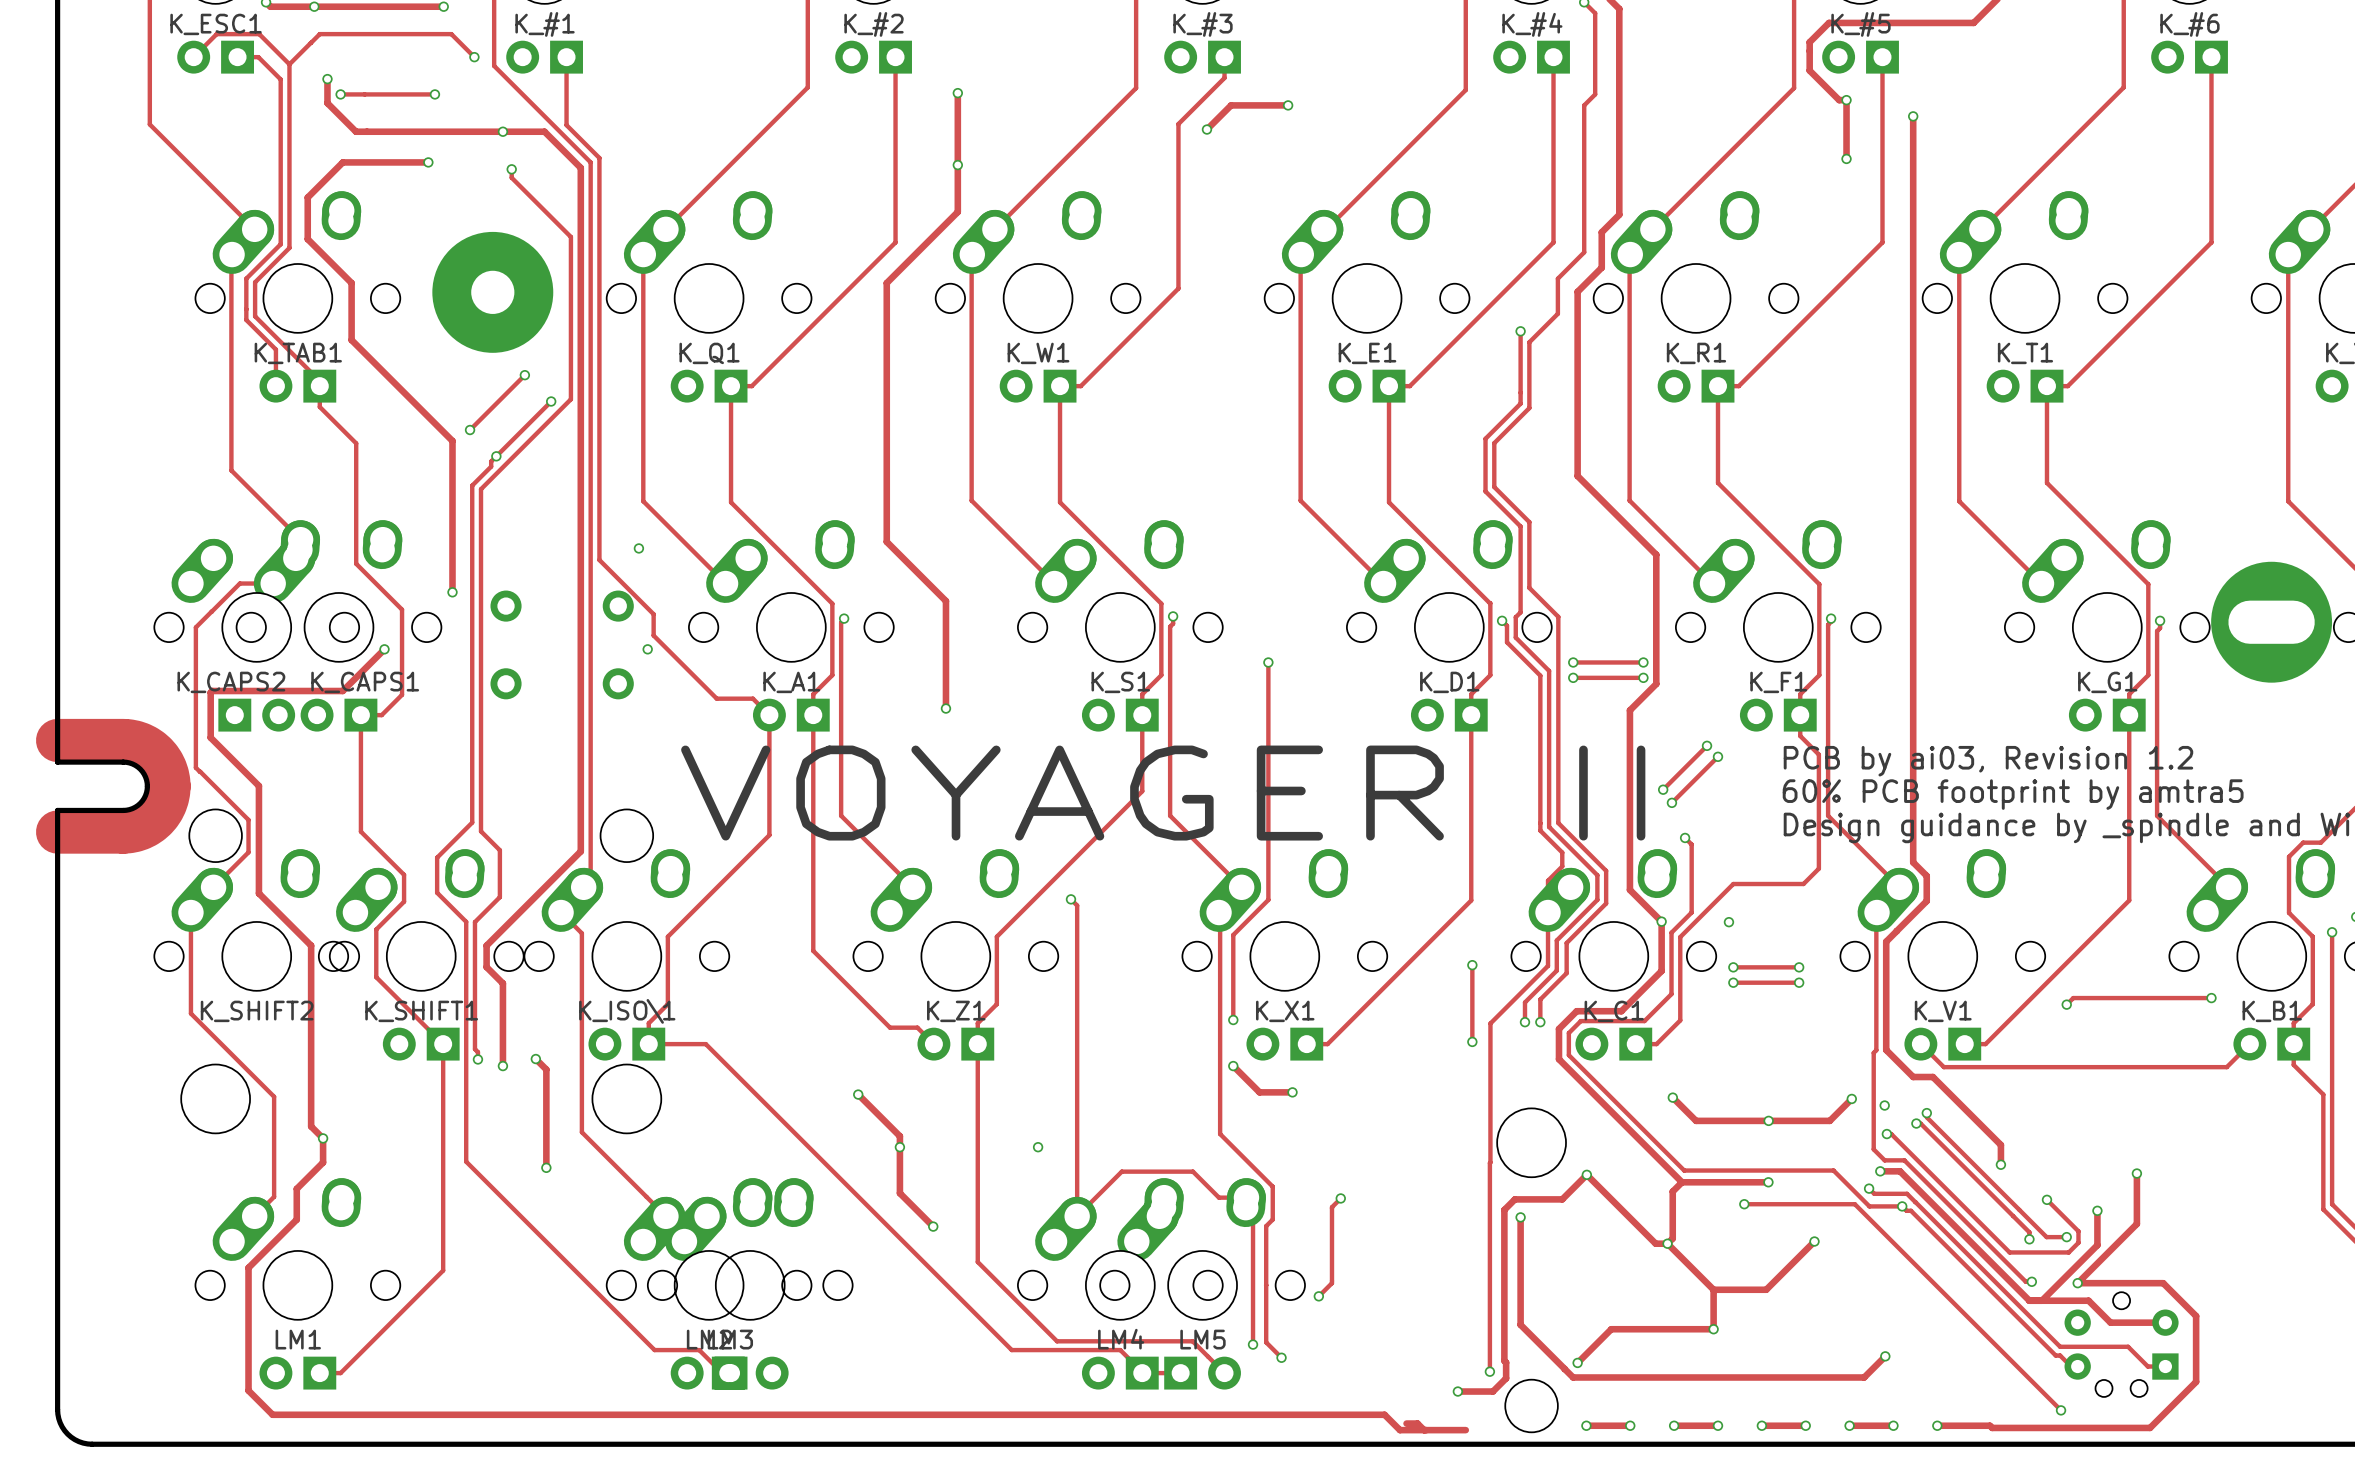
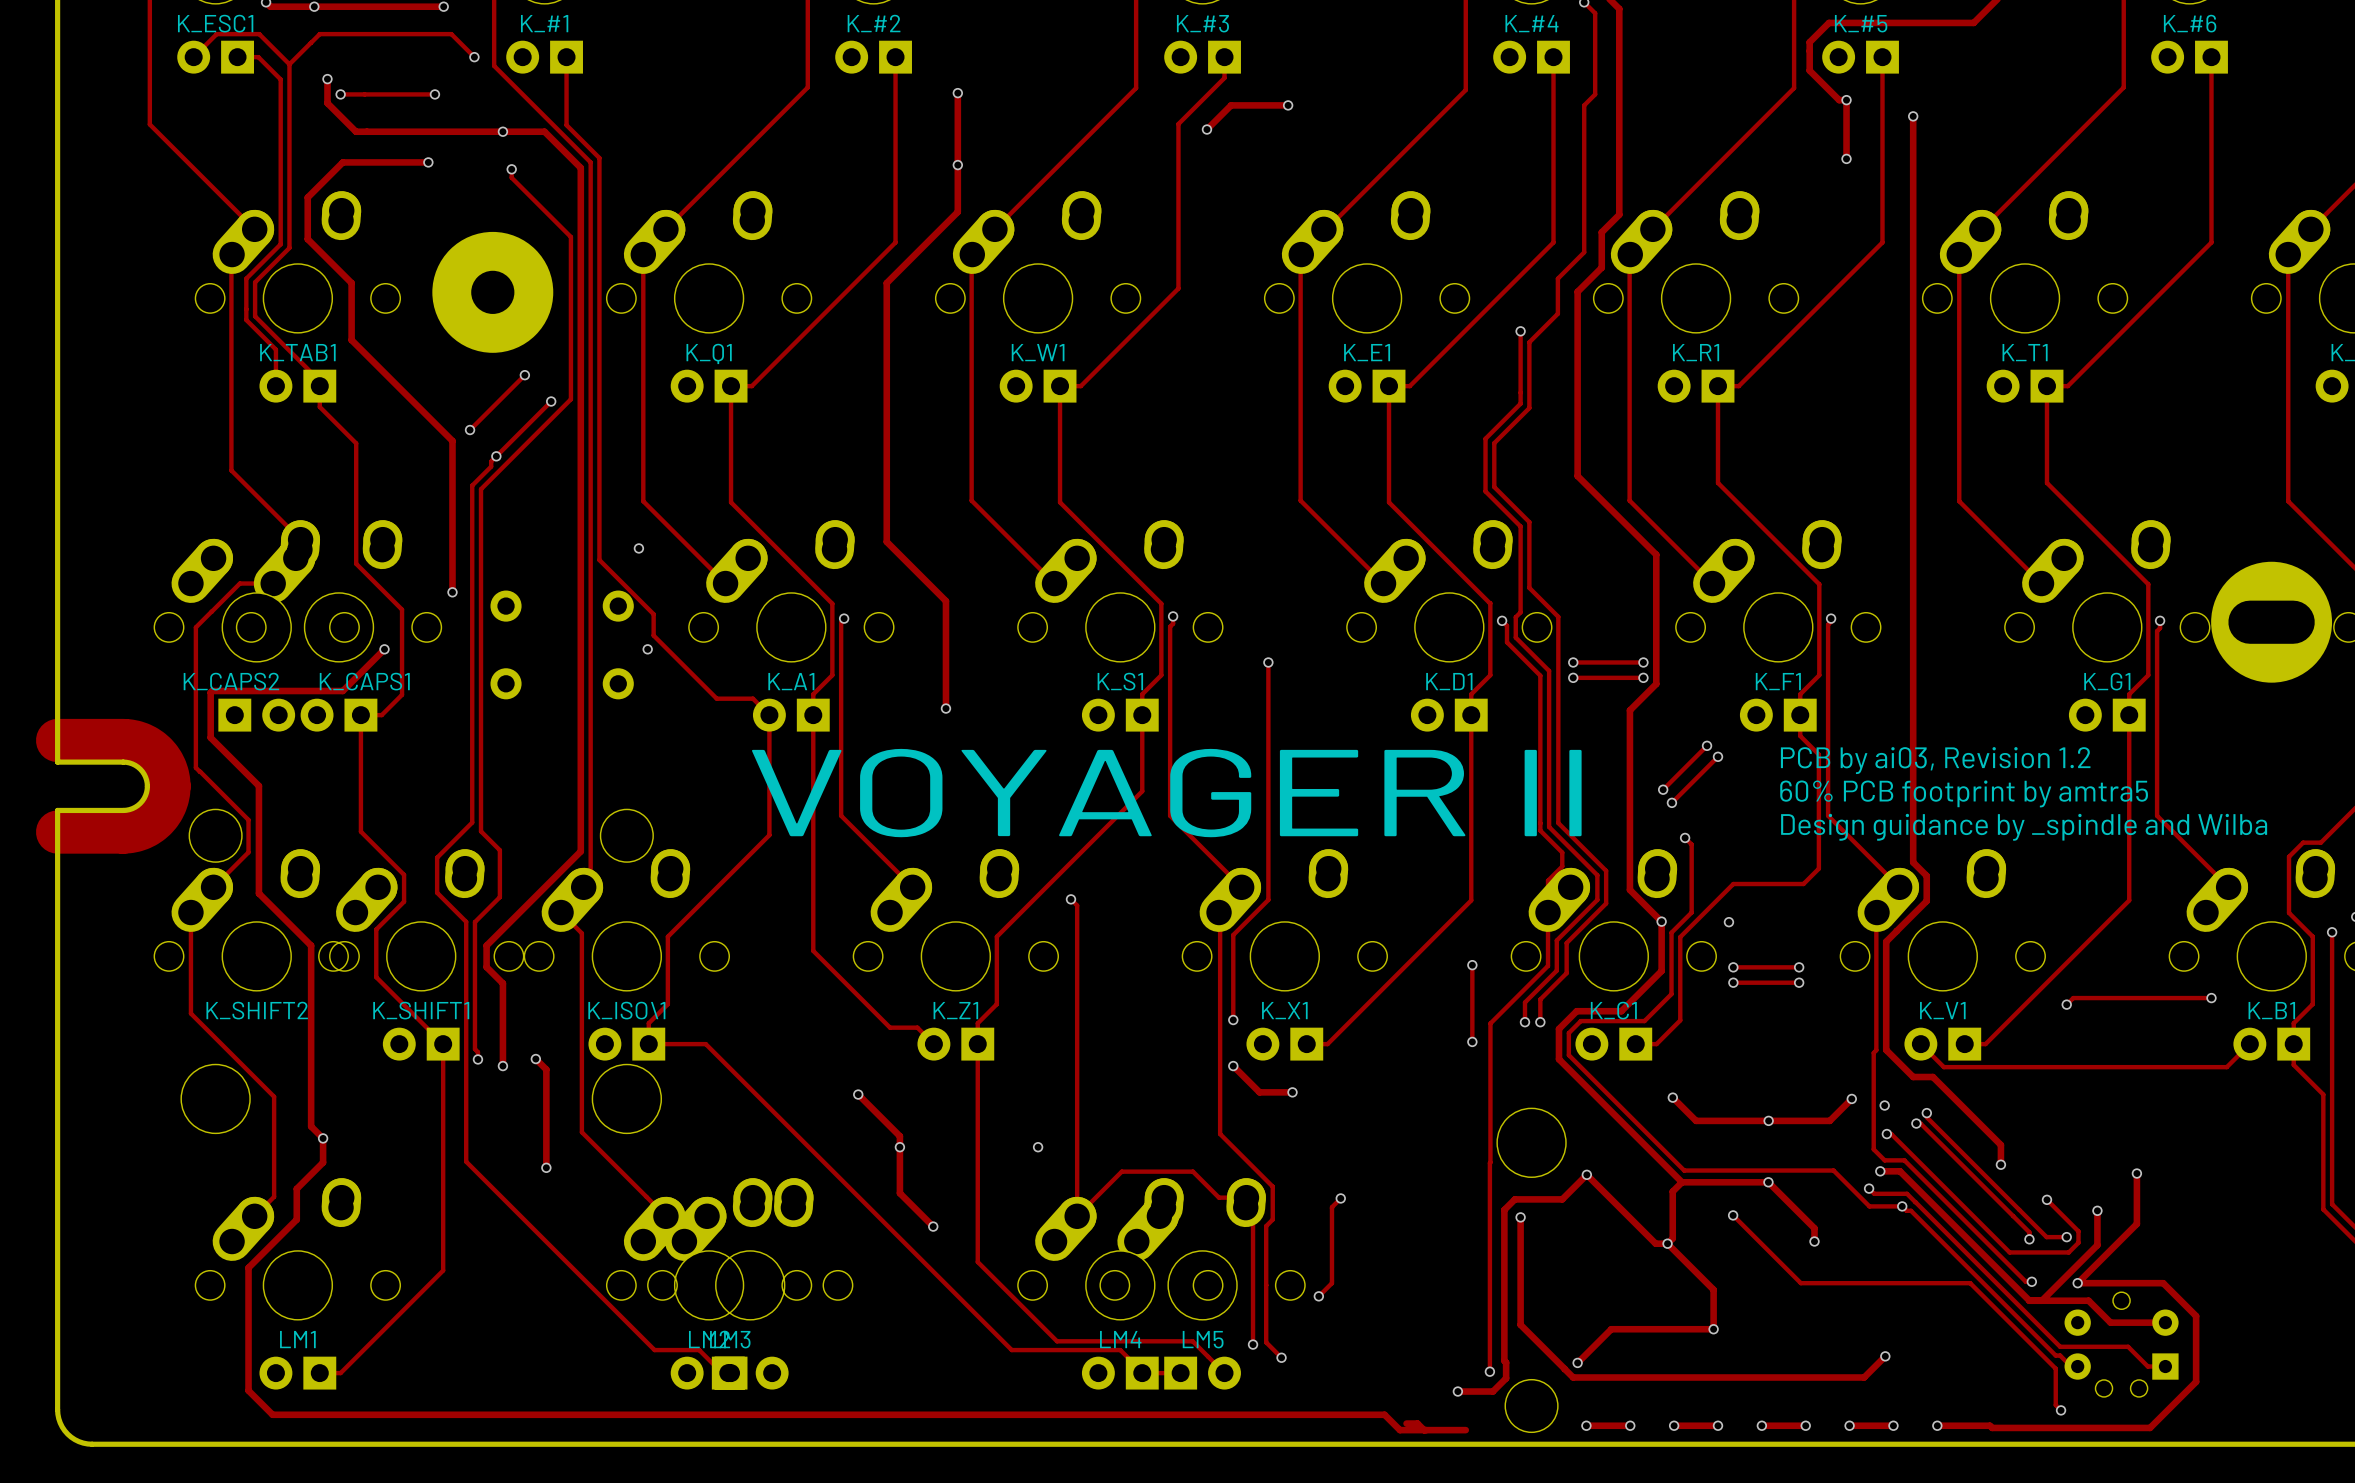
track: (1744, 1204) (1854, 1204) (2055, 1405) -> (1733, 1215) (1800, 1283) (1970, 1283) (2055, 1368) (2055, 1405)
via position: (1744, 1204) -> (1733, 1215)
track: (1814, 1241) (1766, 1289) (1713, 1289) -> (1814, 1241) (1814, 1228) (1768, 1182)

